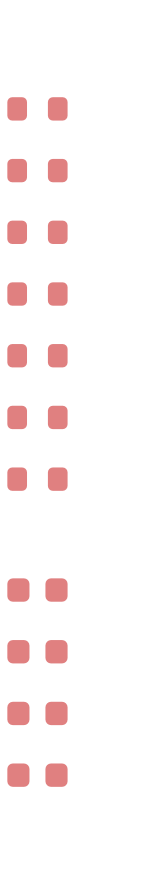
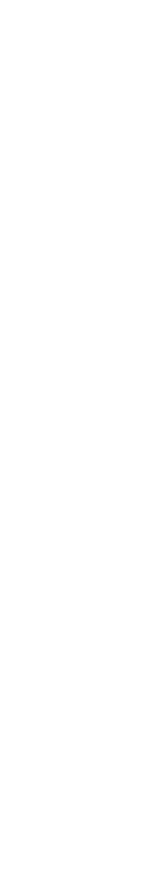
part: (37, 108) -> none
part: (37, 170) -> none
part: (37, 232) -> none
part: (37, 294) -> none
part: (37, 355) -> none
part: (37, 417) -> none
part: (37, 479) -> none
part: (37, 590) -> none
part: (37, 651) -> none
part: (37, 713) -> none
part: (37, 775) -> none

